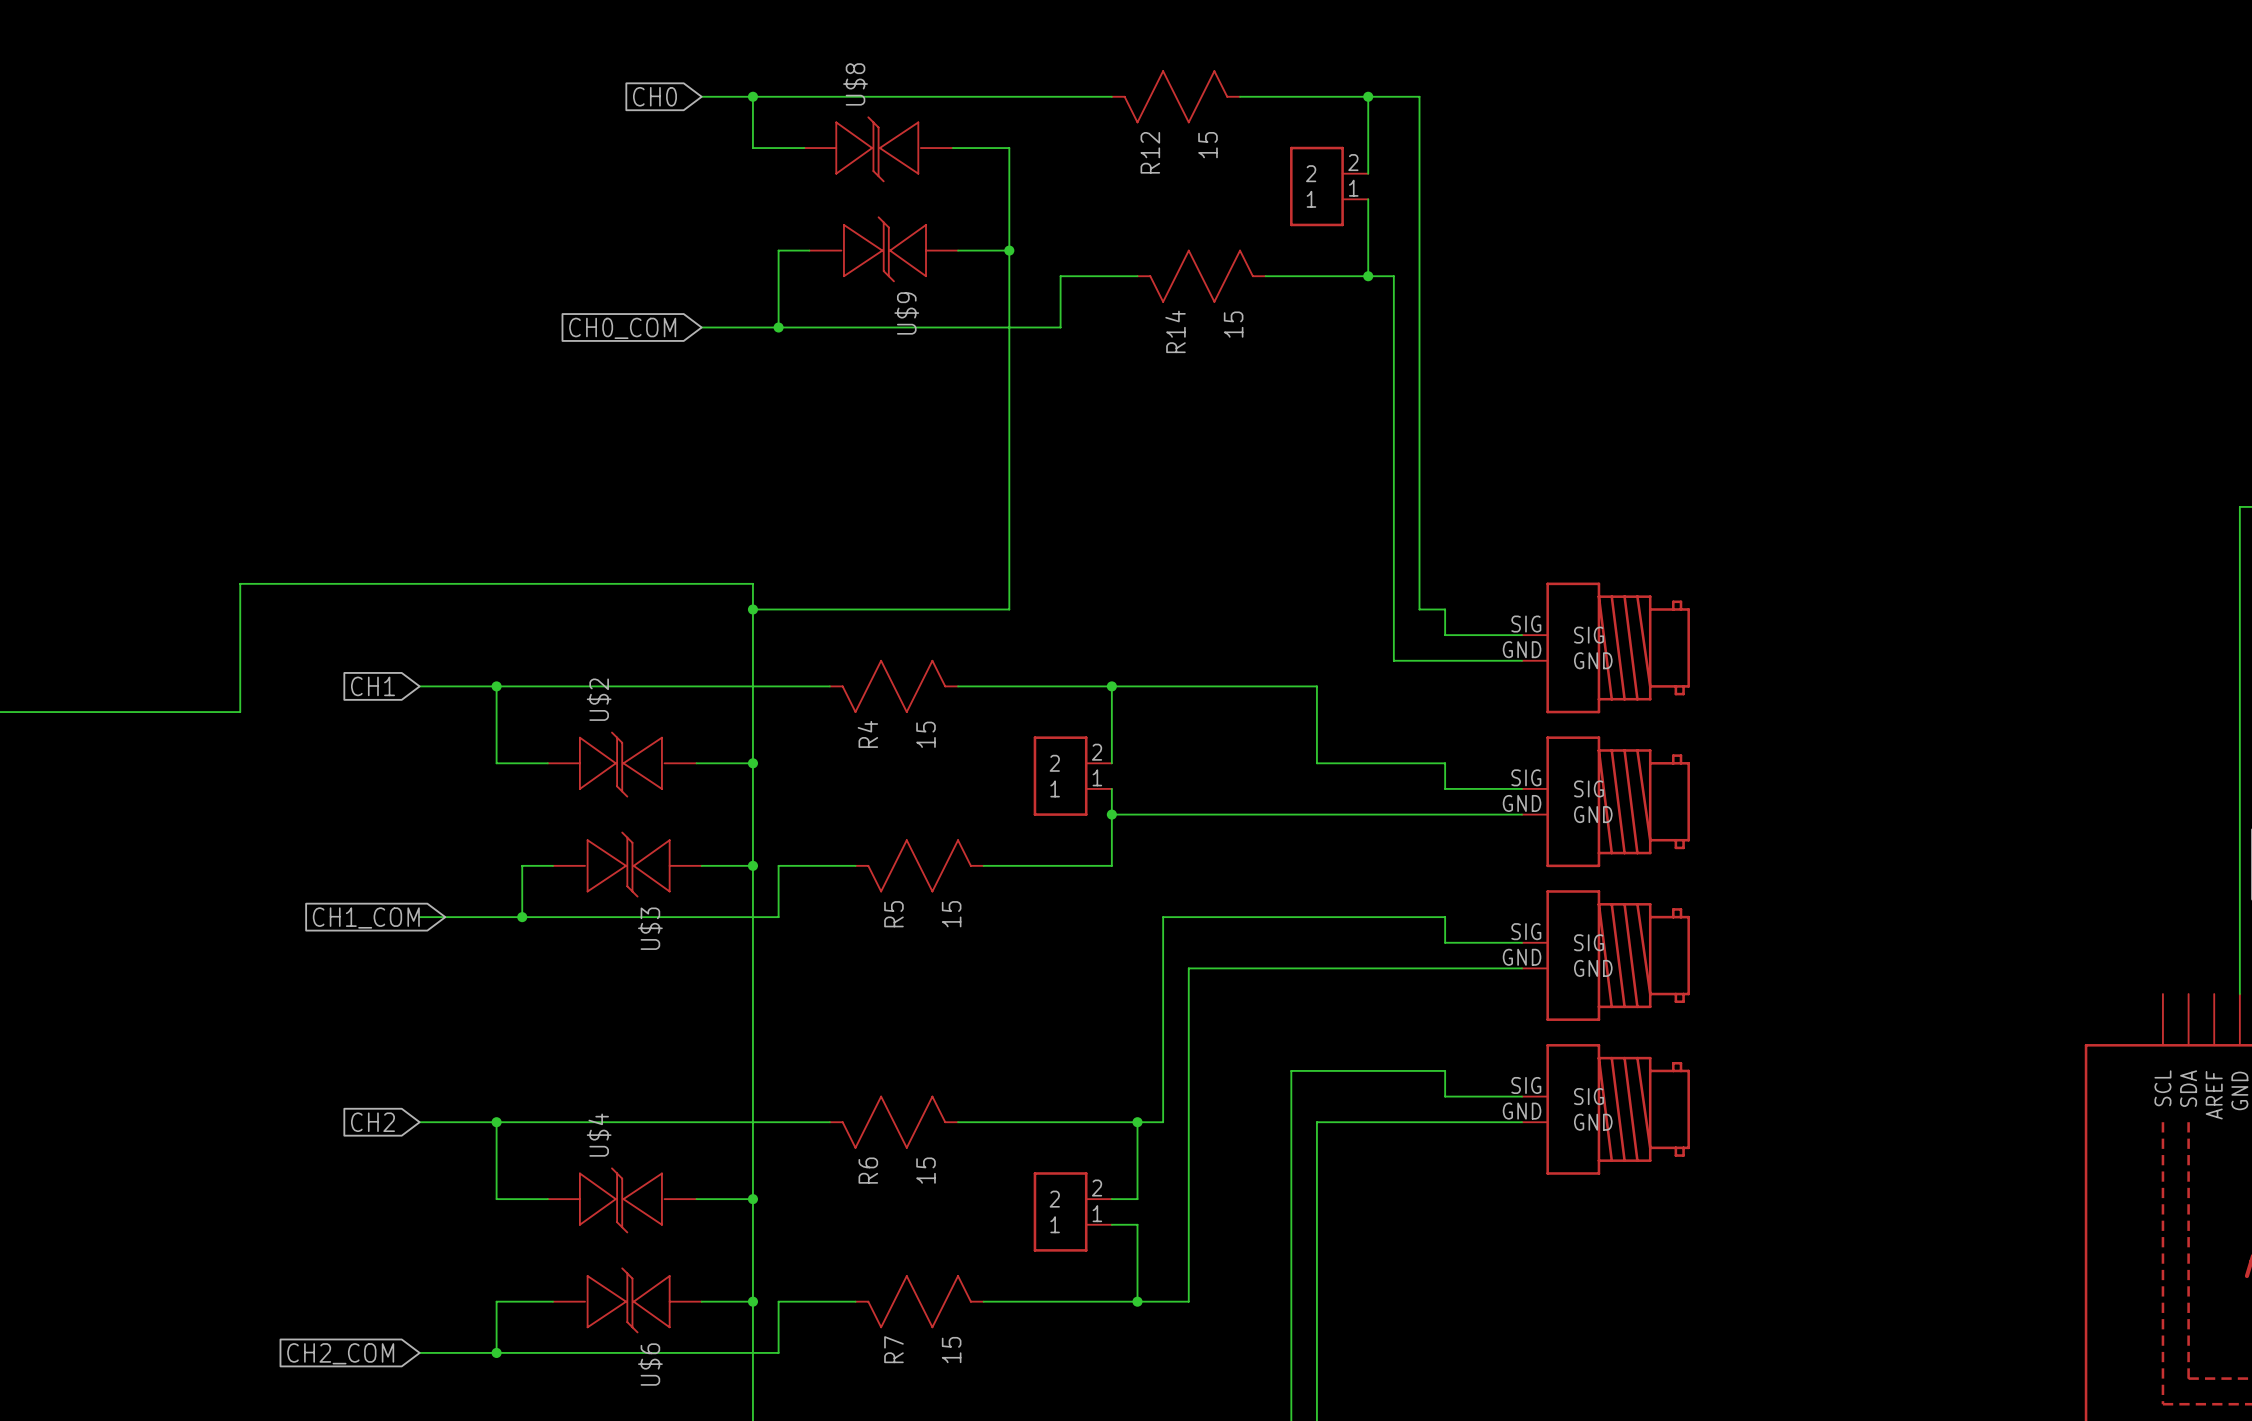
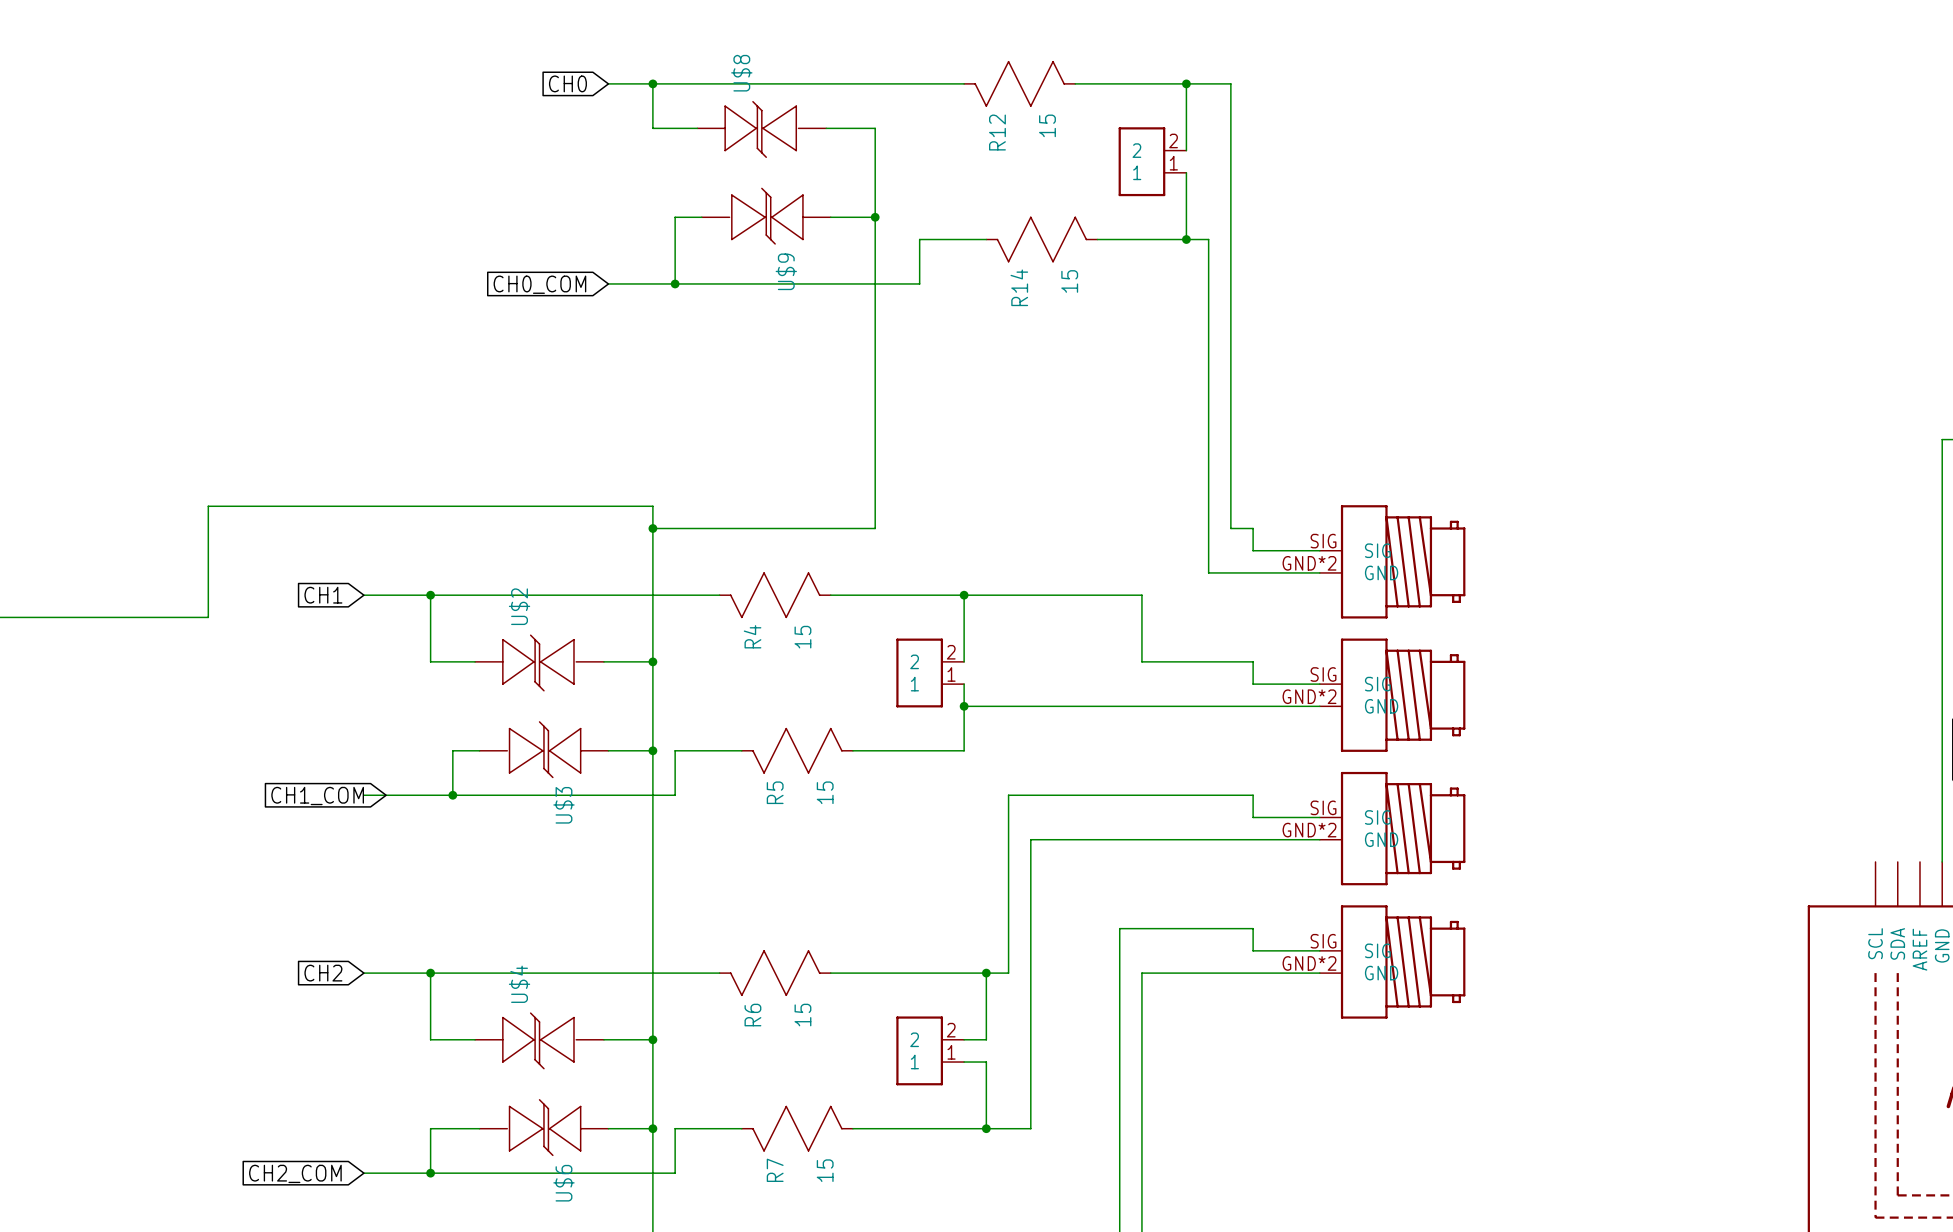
part pin number: GND (1522, 649) -> GND*2 (1309, 563)
part pin number: GND (1522, 803) -> GND*2 (1309, 696)
part pin number: GND (1522, 957) -> GND*2 (1309, 830)
part pin number: GND (1522, 1111) -> GND*2 (1309, 963)

